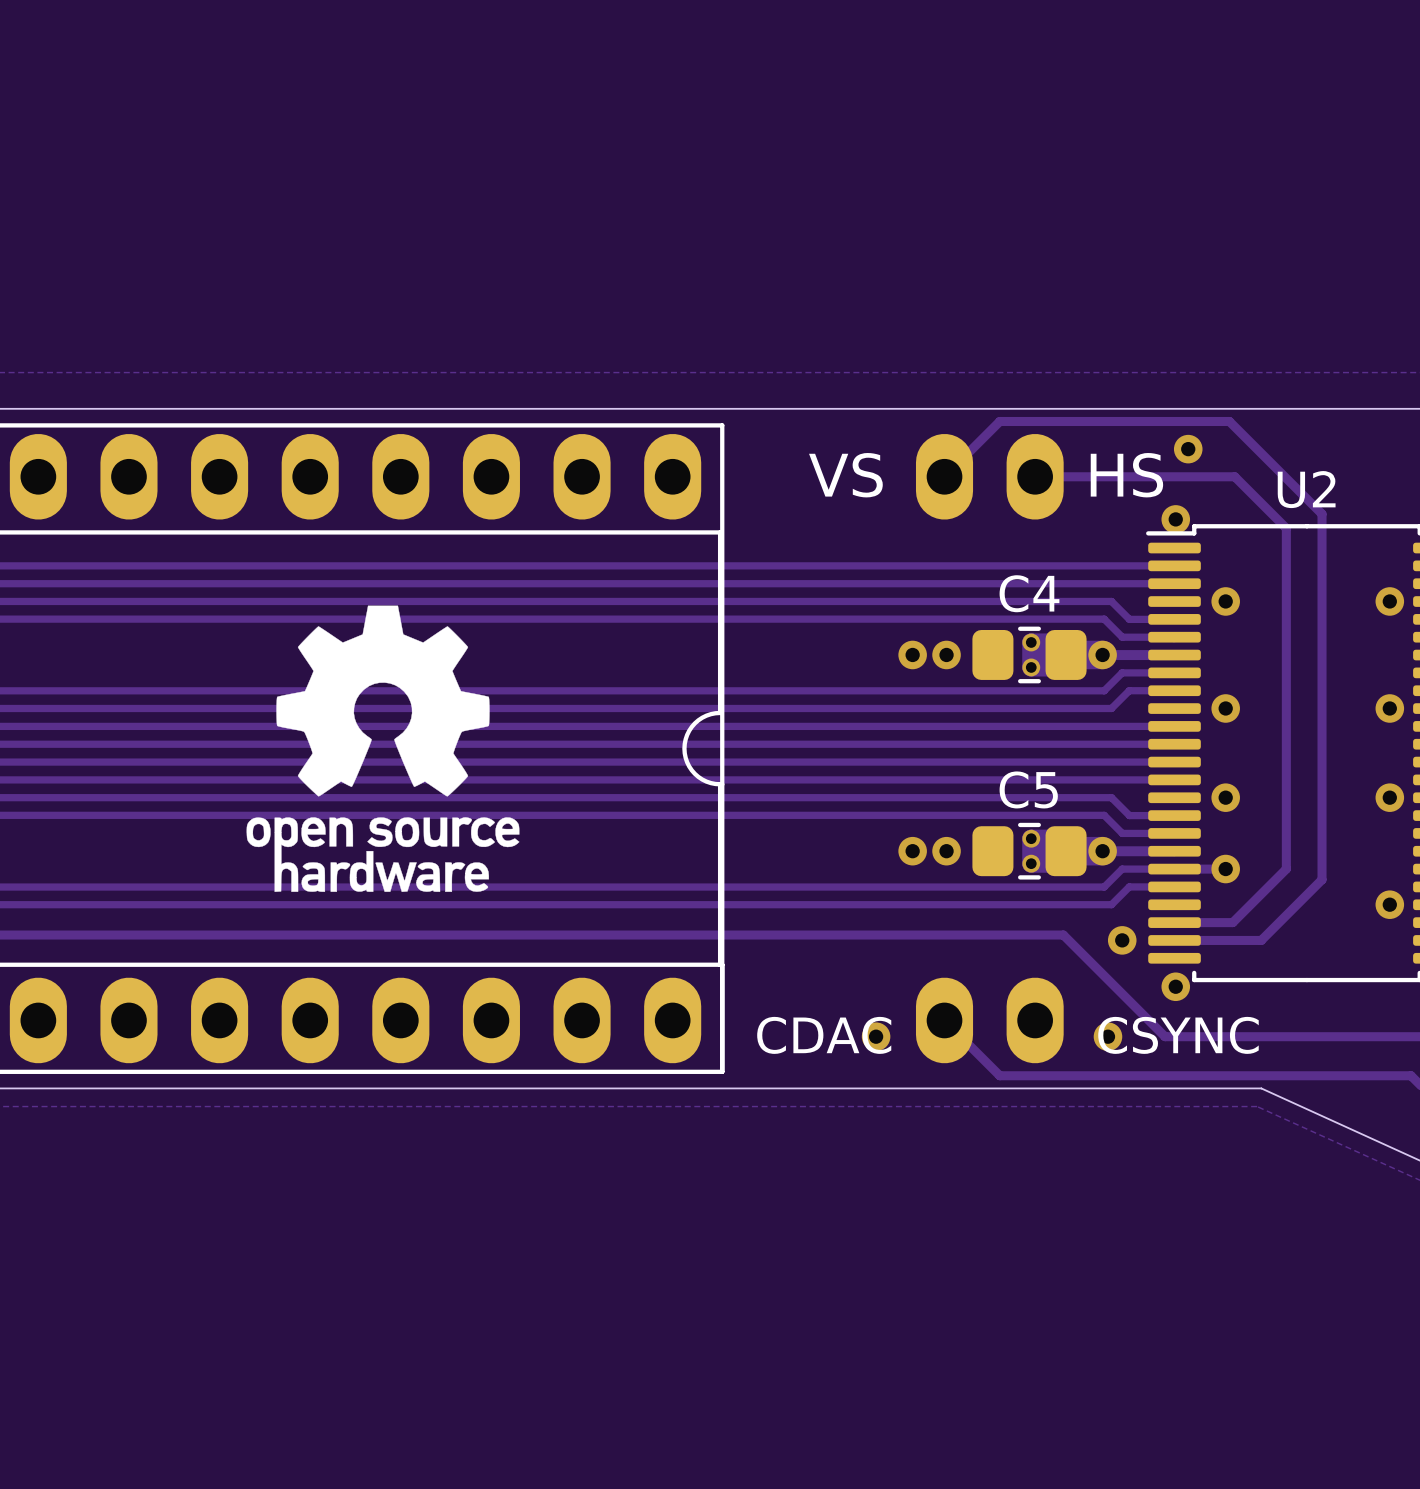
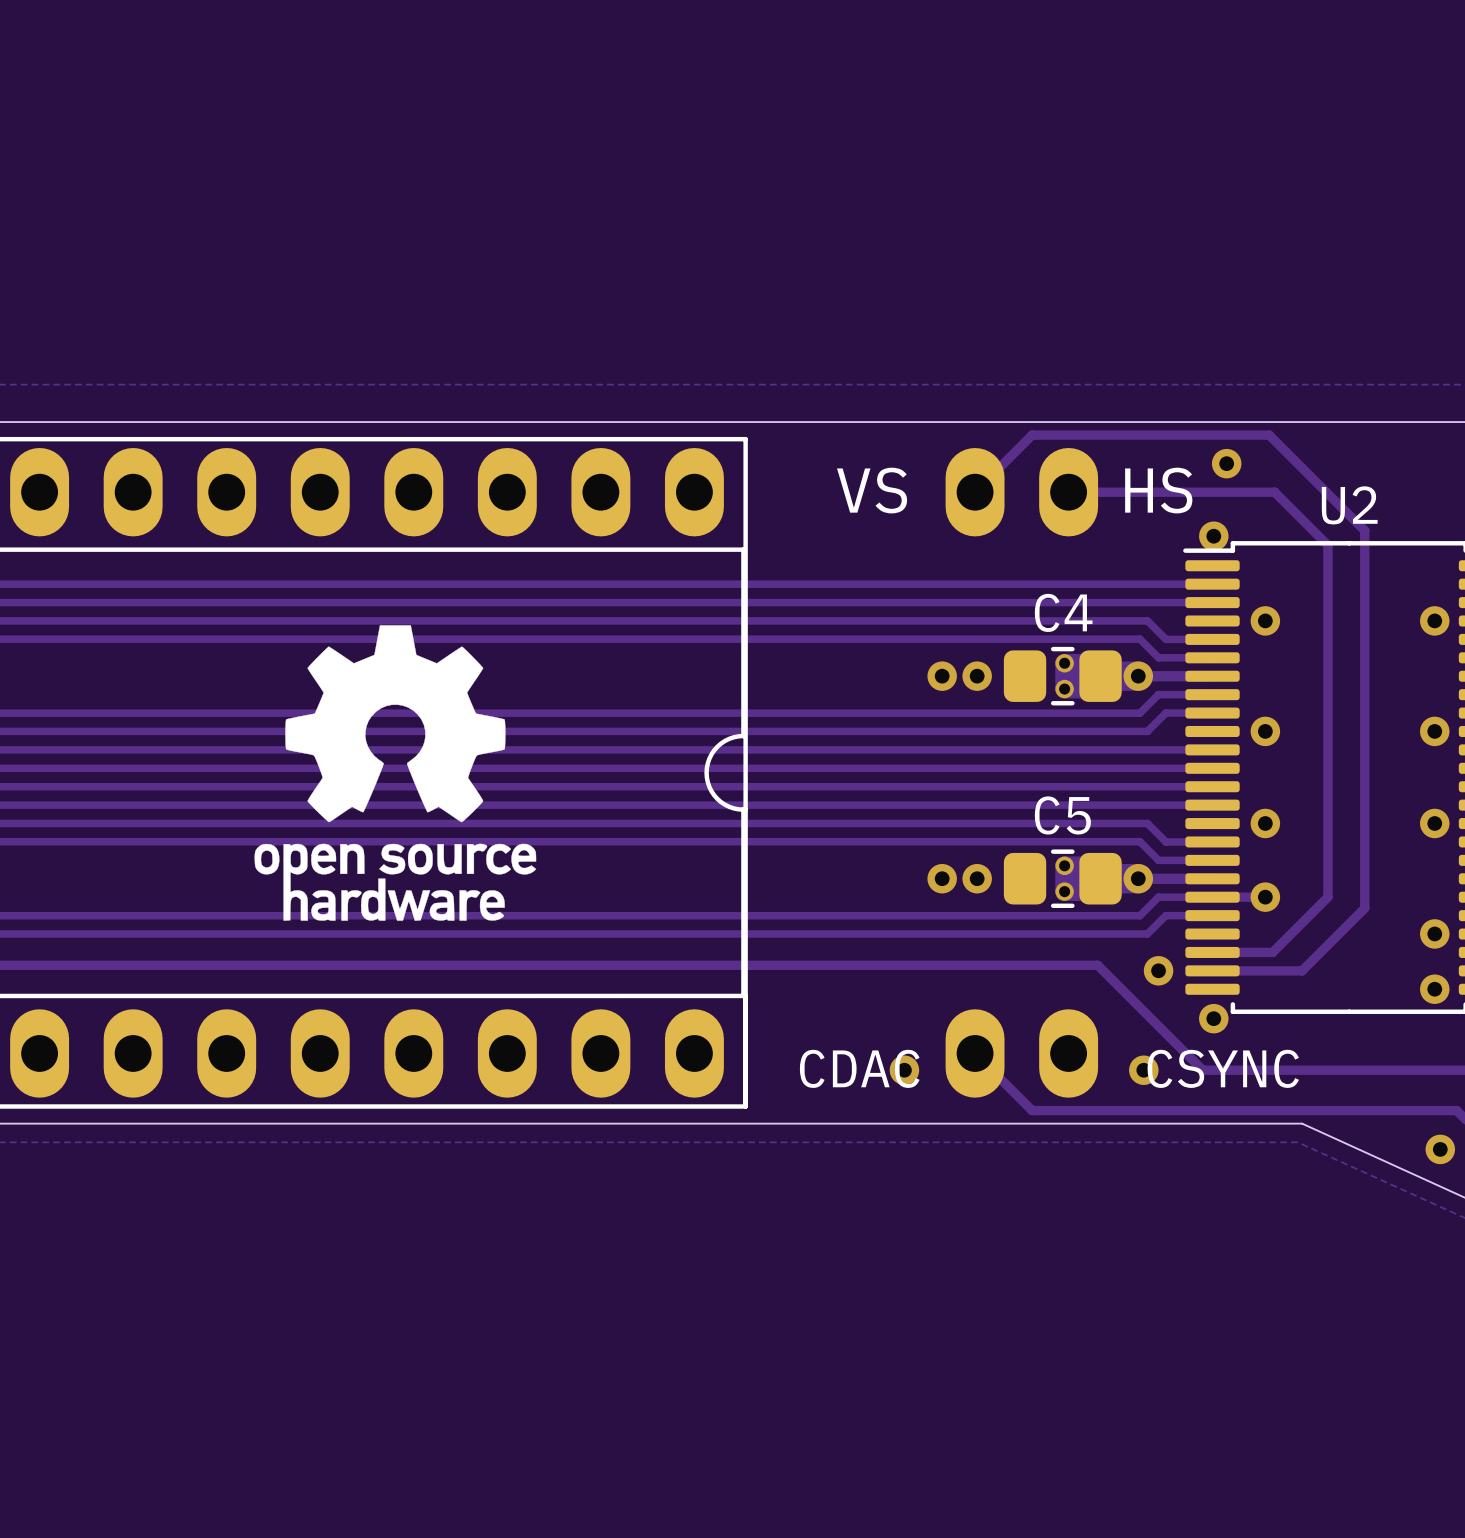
via: none -> (1434, 989)
via: none -> (1440, 1149)

